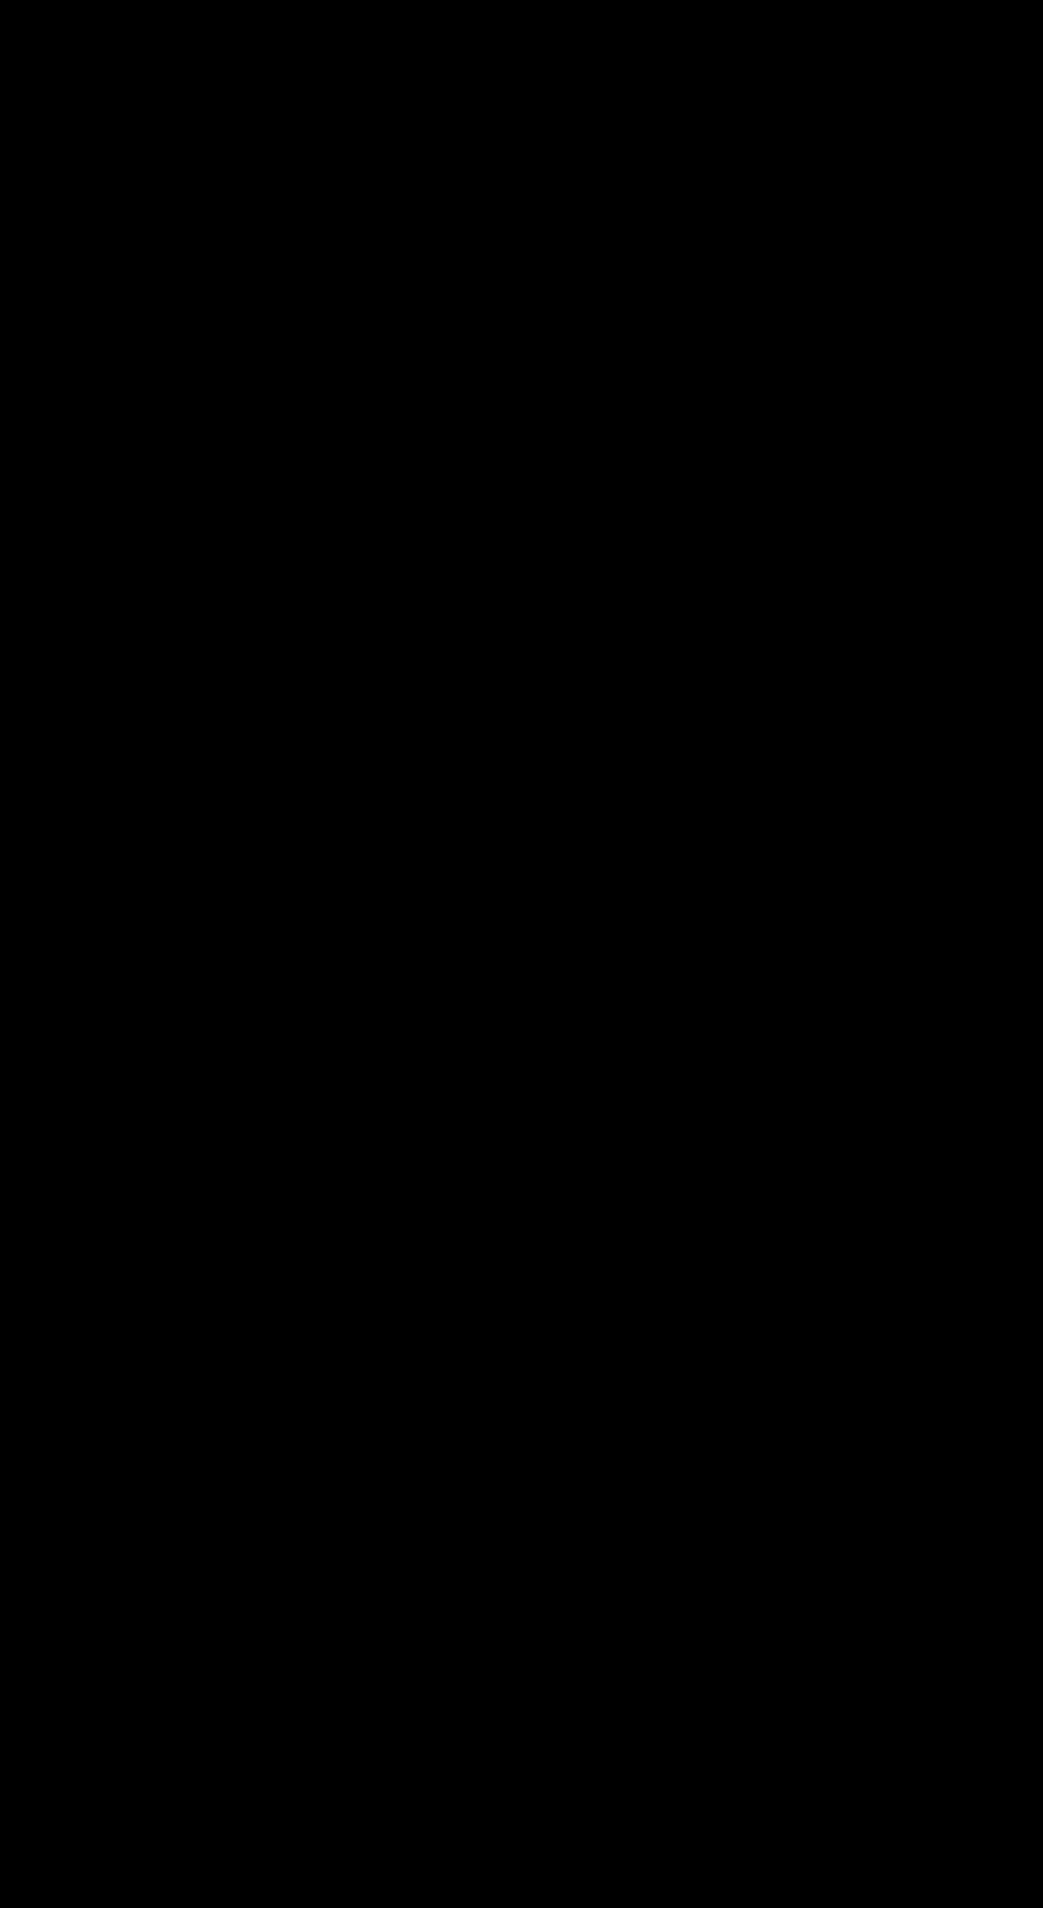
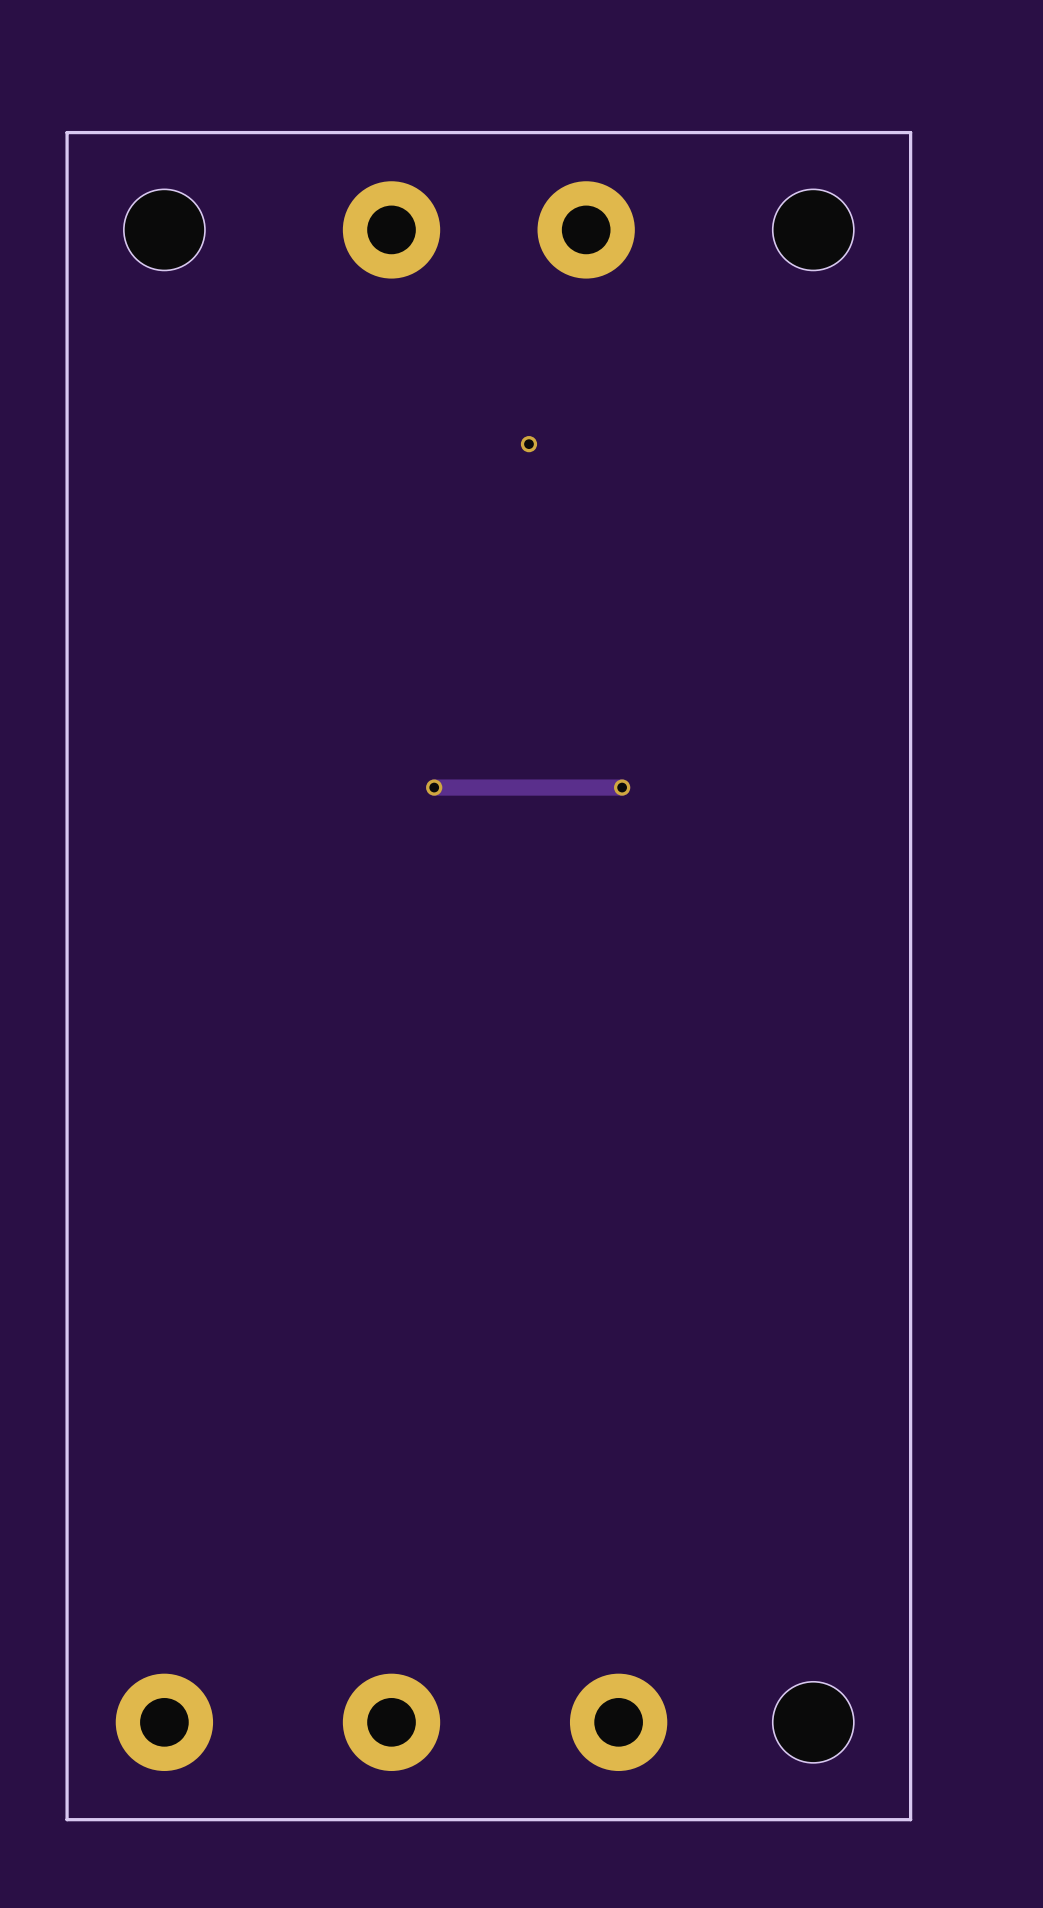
board edge: none -> (910, 132) (67, 132) (67, 1819) (910, 1819) (910, 132)
part: none -> (164, 229)
part: none -> (391, 229)
part: none -> (586, 229)
part: none -> (813, 229)
via: none -> (528, 444)
via: none -> (434, 787)
track: none -> (622, 787) (434, 787)
via: none -> (622, 787)
part: none -> (164, 1722)
part: none -> (391, 1722)
part: none -> (618, 1722)
part: none -> (813, 1722)

